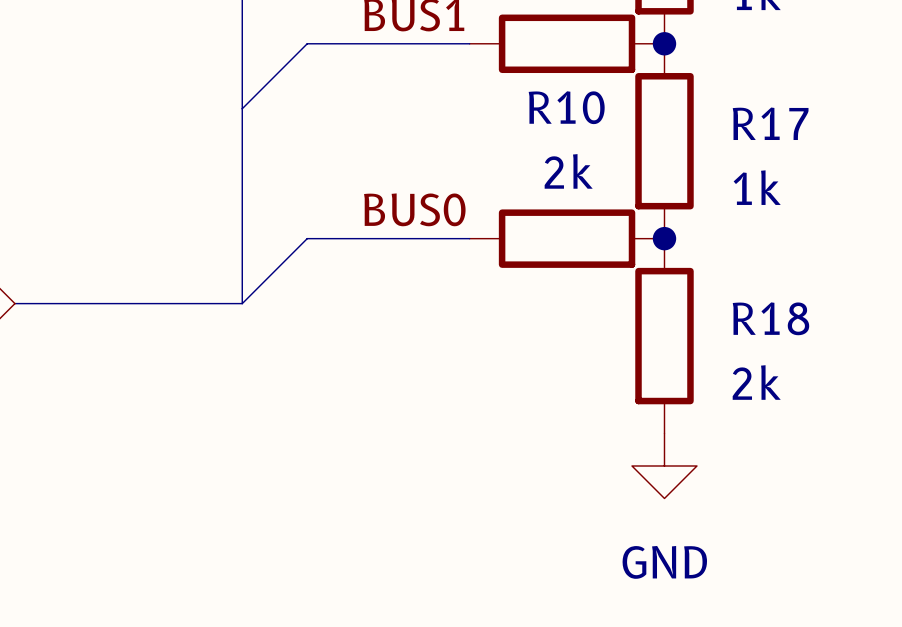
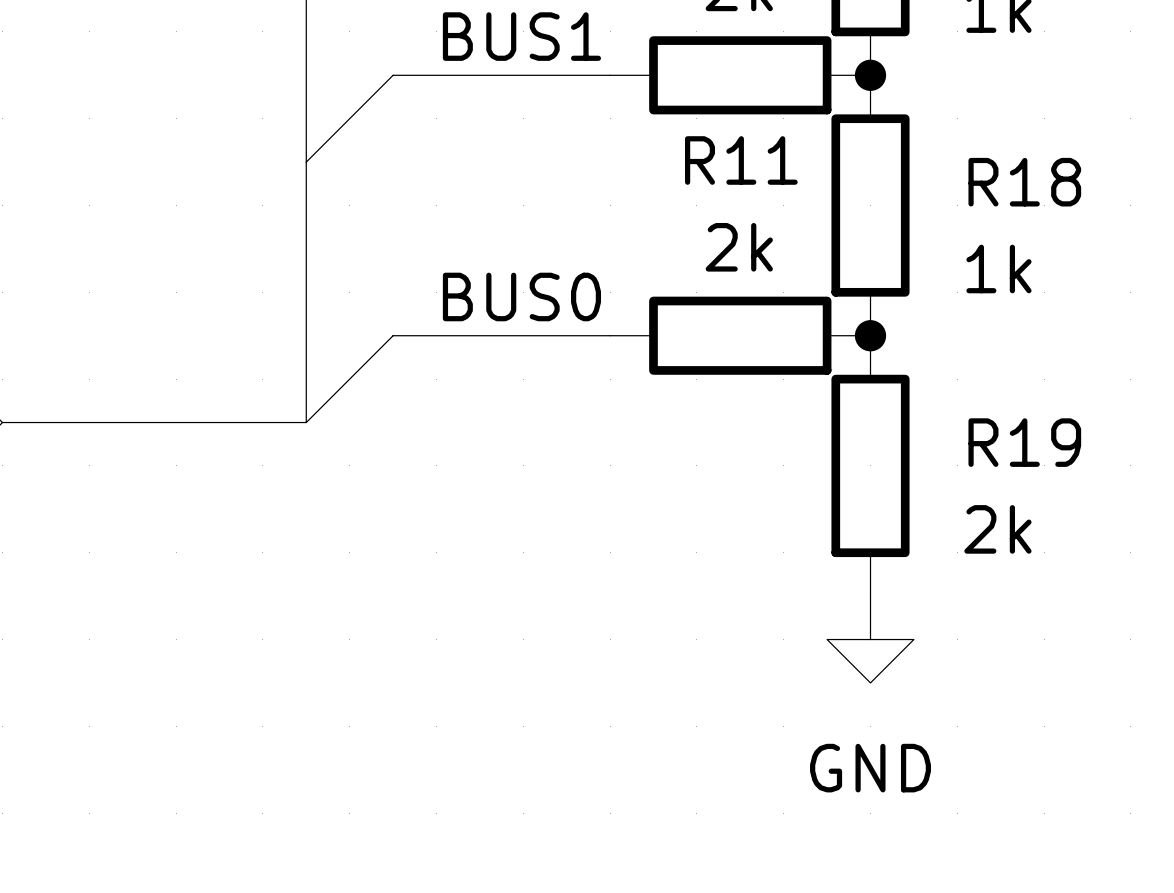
R10 name: R10 (566, 107) -> R11 (741, 160)
R17 name: R17 (770, 123) -> R18 (1024, 182)
R18 name: R18 (770, 318) -> R19 (1024, 442)

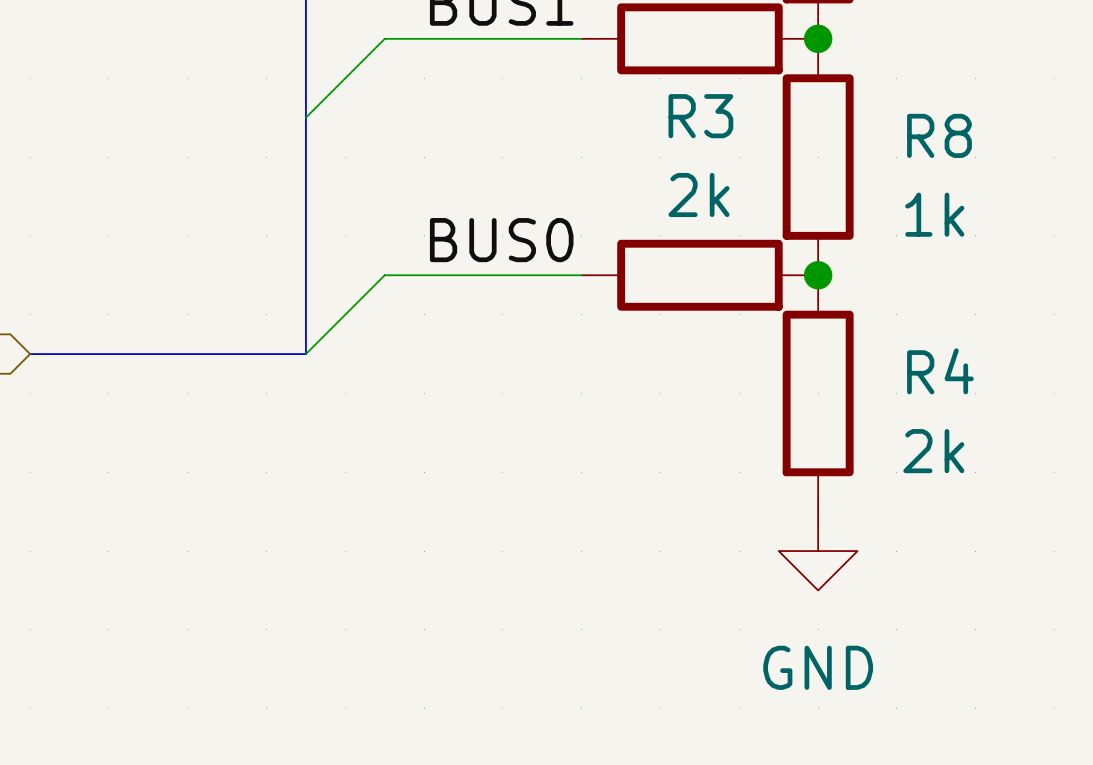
R11 name: R11 (741, 160) -> R3 (700, 116)
R18 name: R18 (1024, 182) -> R8 (939, 135)
R19 name: R19 (1024, 442) -> R4 (940, 371)

